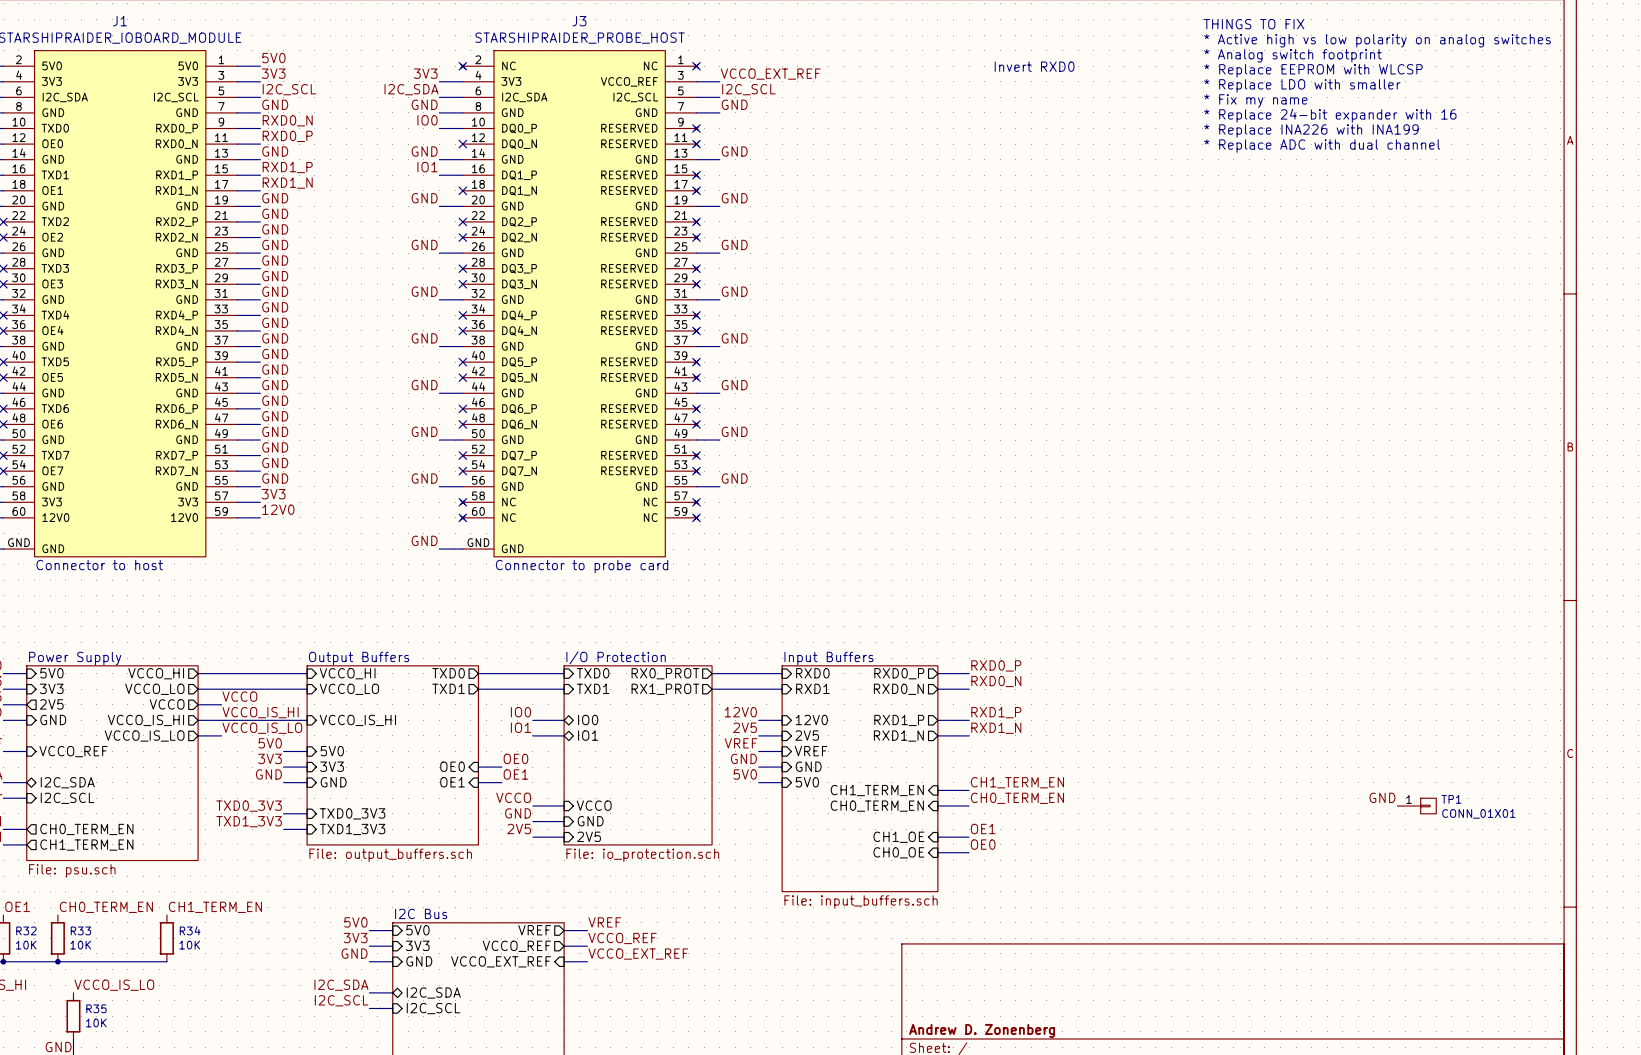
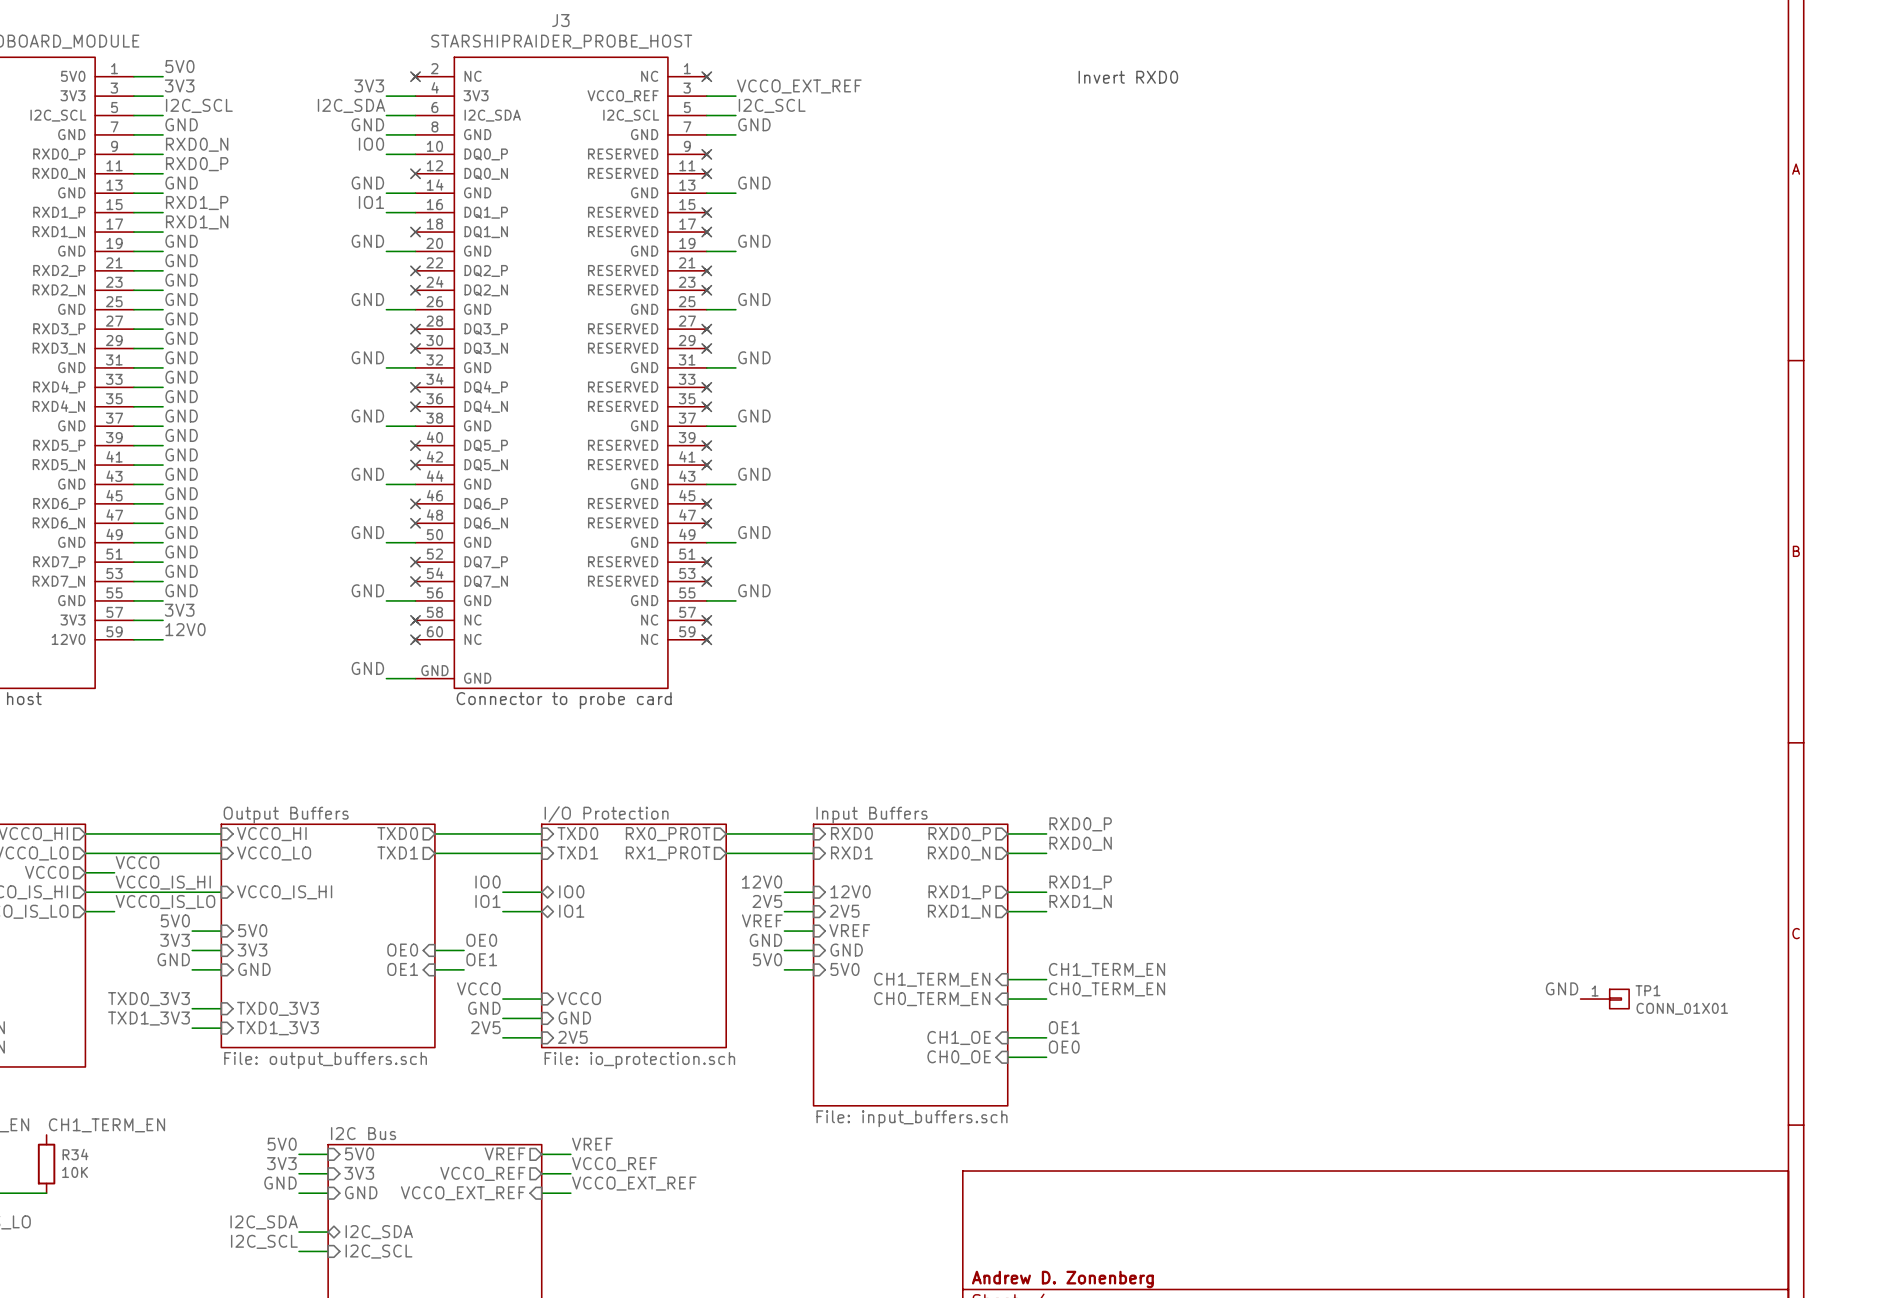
text: THINGS TO FIX (1253, 24) -> none
text: * Active high vs low polarity on analog switches (1377, 40) -> none
text: * Analog switch footprint (1292, 55) -> none
text: * Replace EEPROM with WLCSP (1313, 70) -> none
text: * Replace LDO with smaller (1302, 85) -> none
text: * Fix my name (1255, 100) -> none
text: * Replace 24-bit expander with 16 (1330, 115) -> none
text: * Replace INA226 with INA199 (1311, 131) -> none
text: * Replace ADC with dual channel (1322, 146) -> none

